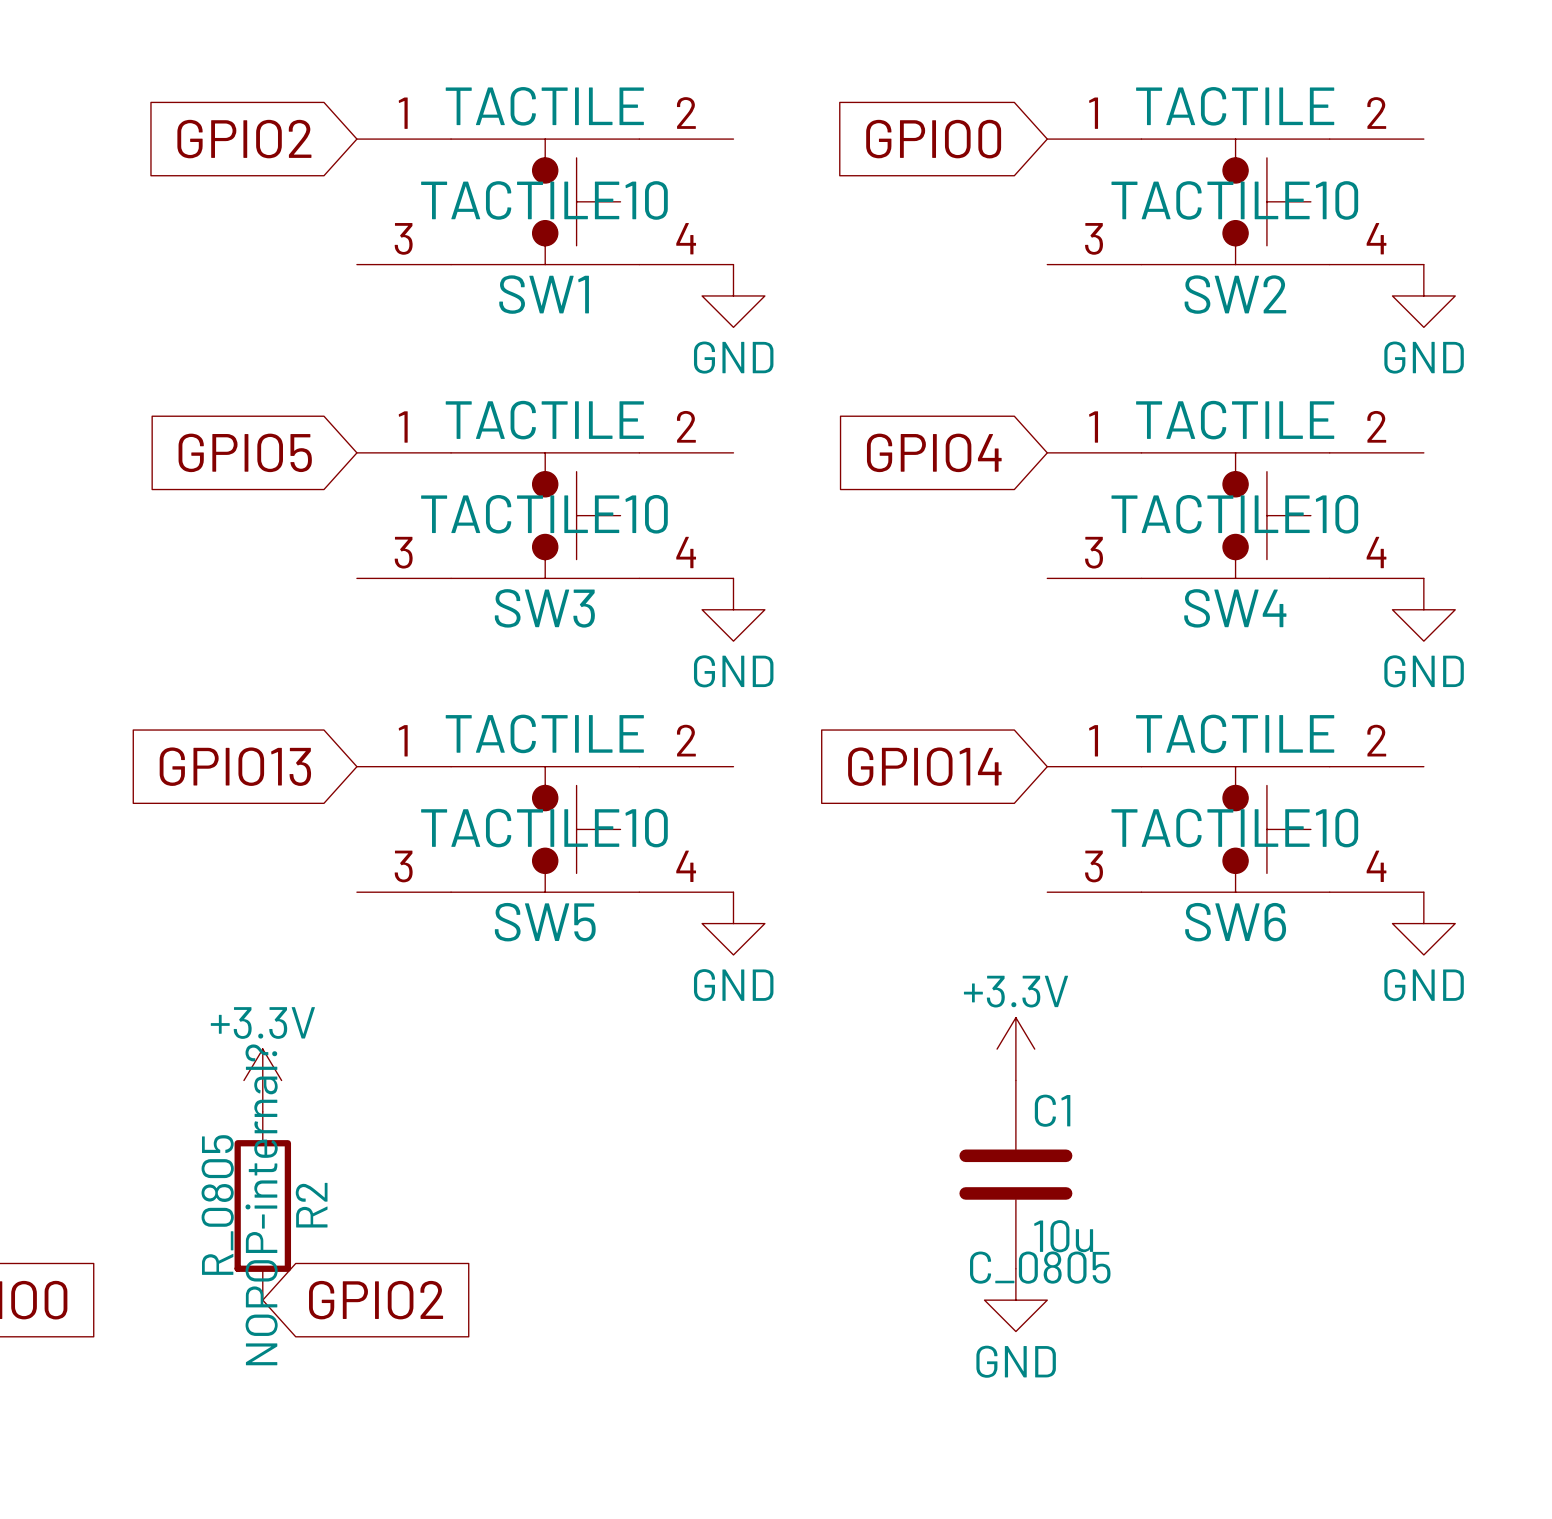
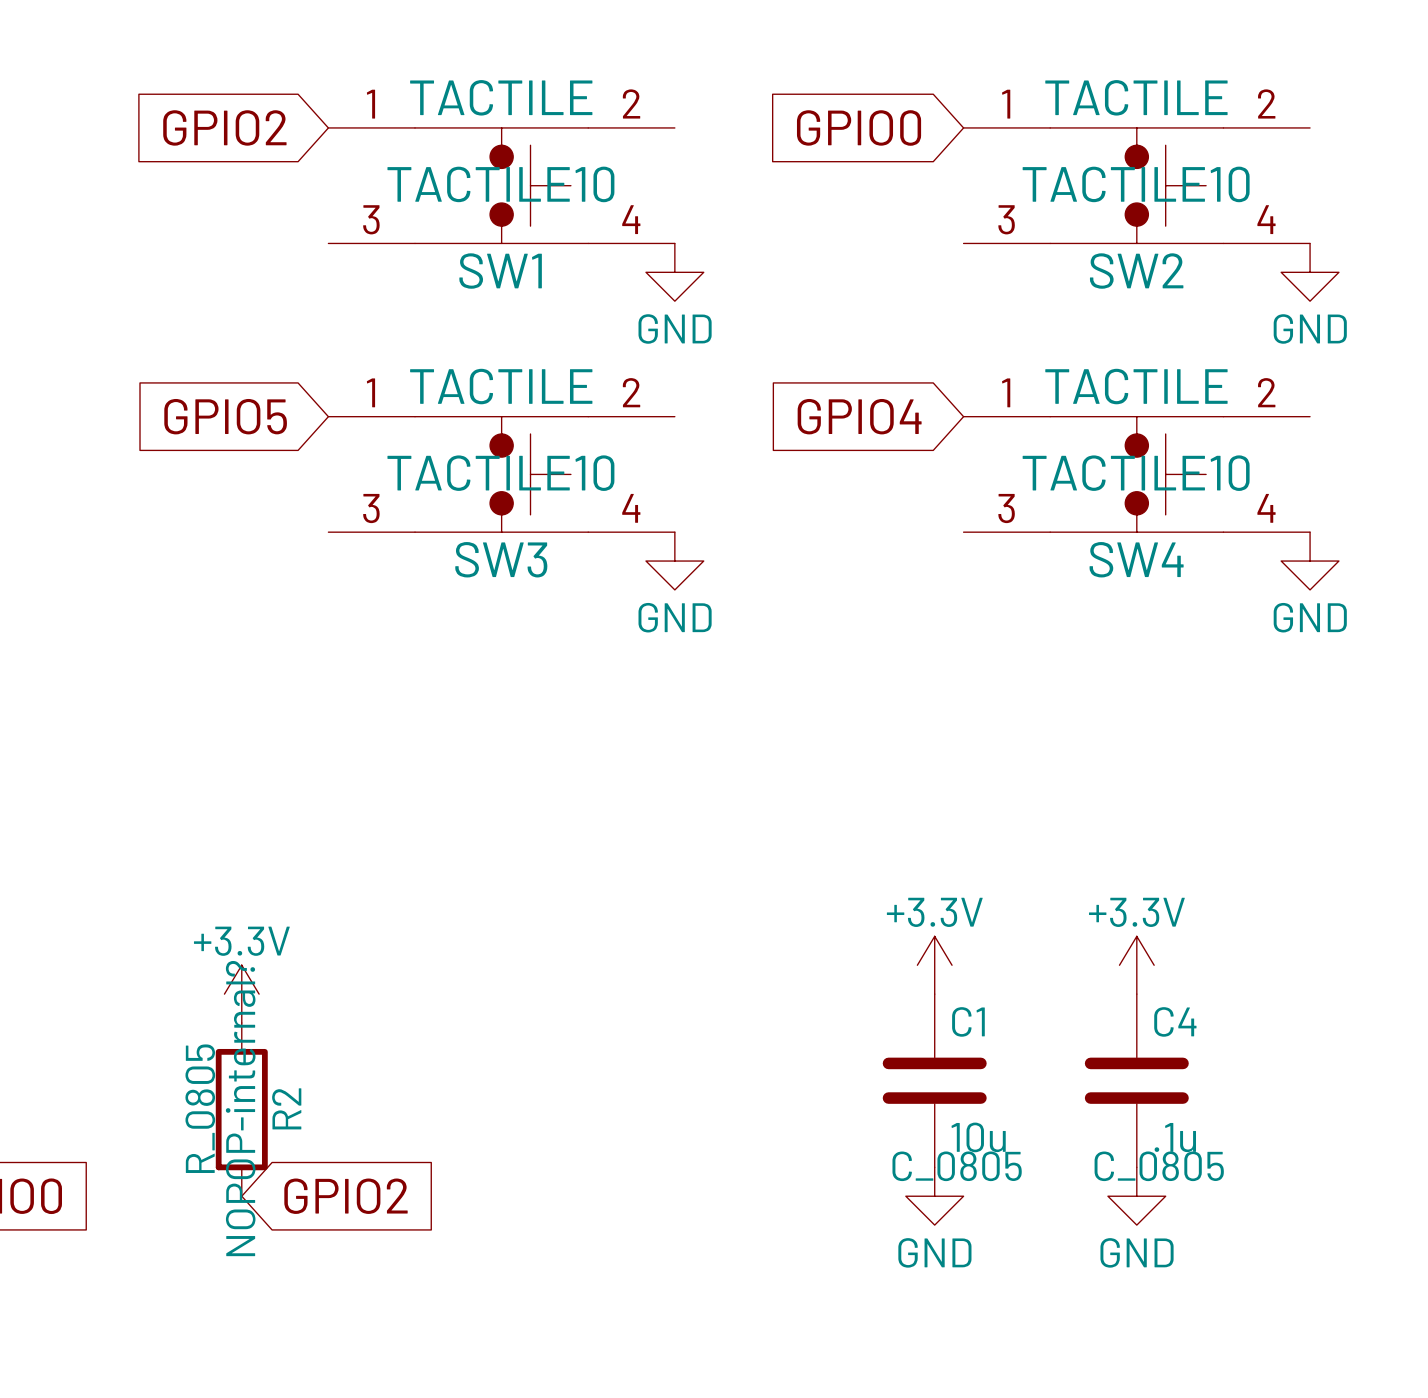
global label: GPIO13 (235, 766) -> none
global label: GPIO14 (924, 766) -> none
SW5: TACTILE (545, 829) -> none
SW6: TACTILE (1235, 829) -> none
power symbol: GND (733, 923) -> none
power symbol: GND (1423, 923) -> none
power symbol: none -> +3.3V (1136, 965)
C4: none -> .1u (1136, 1080)
power symbol: none -> GND (1136, 1196)

